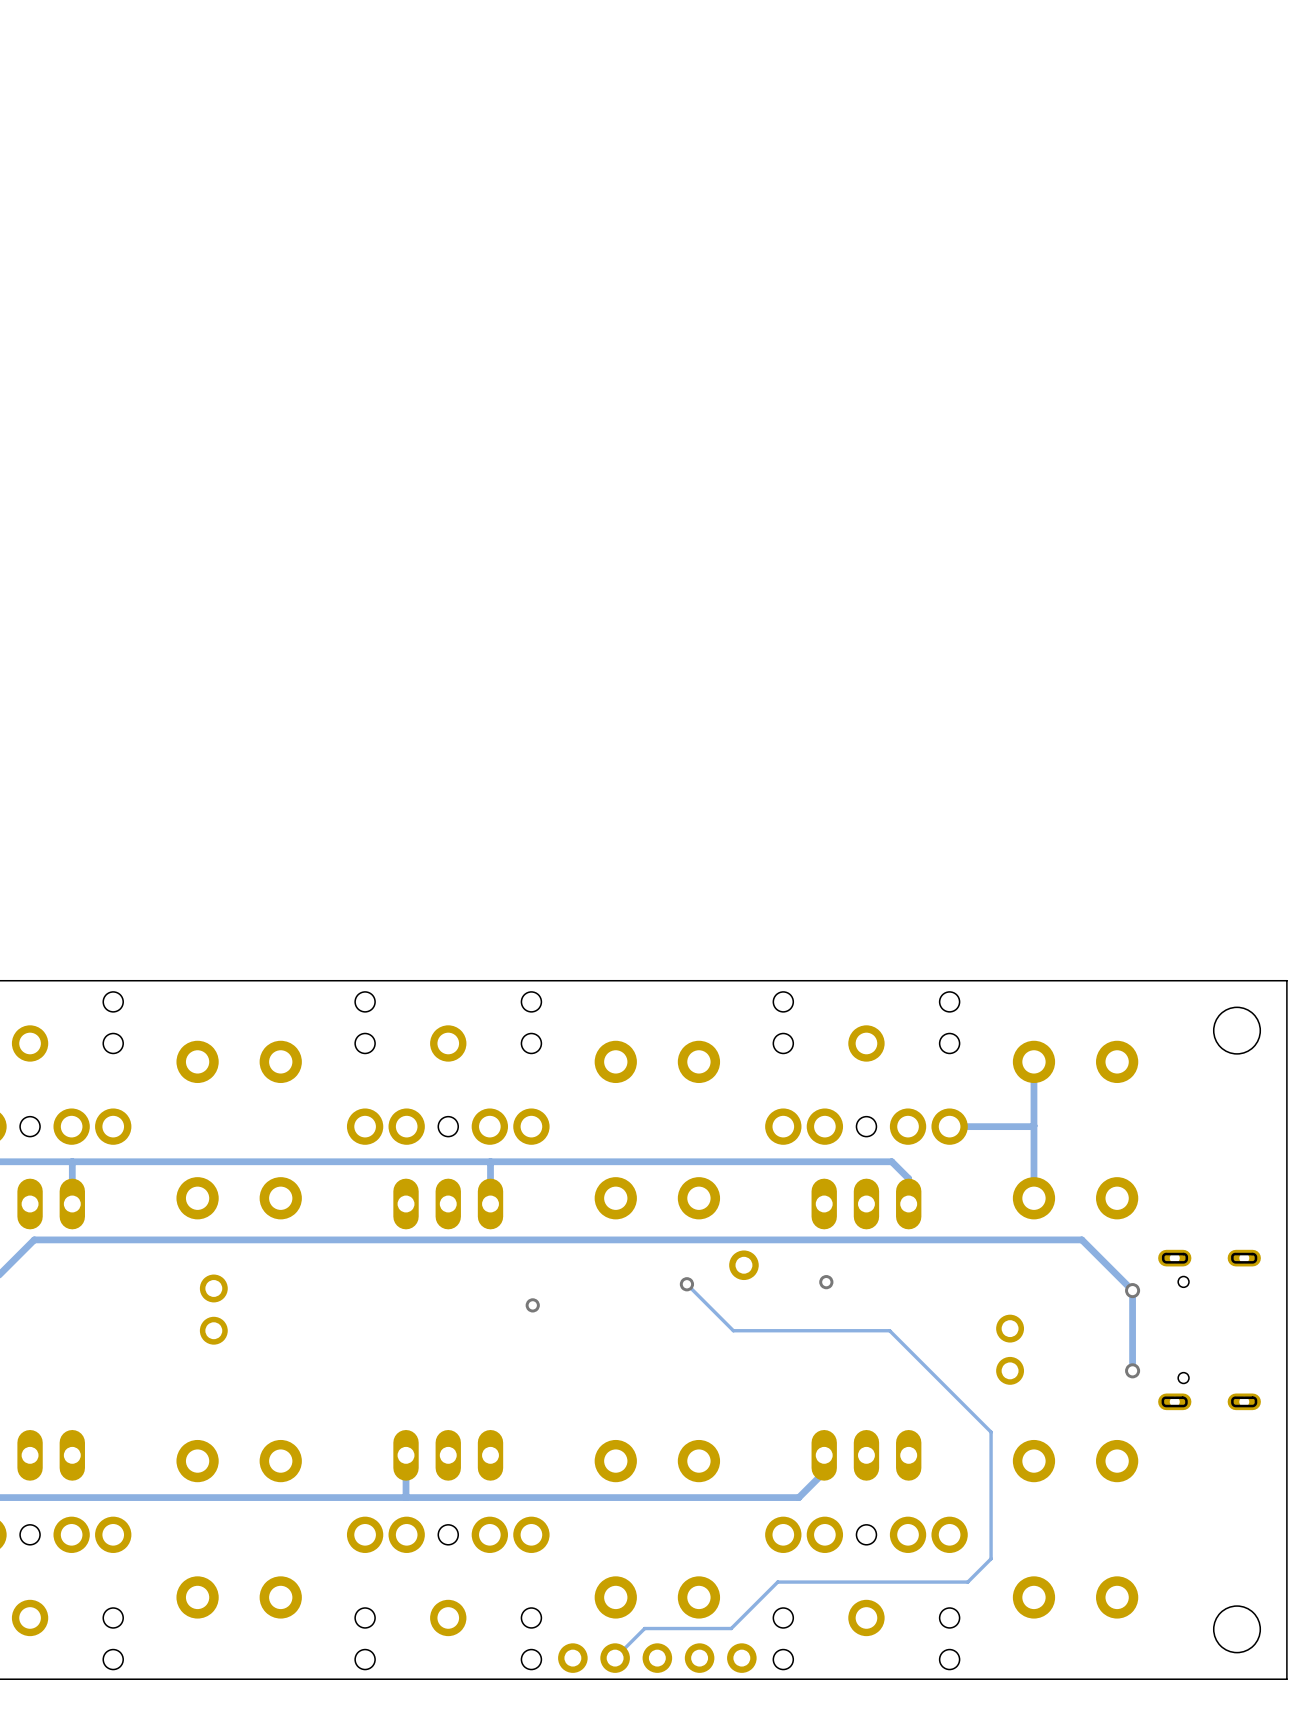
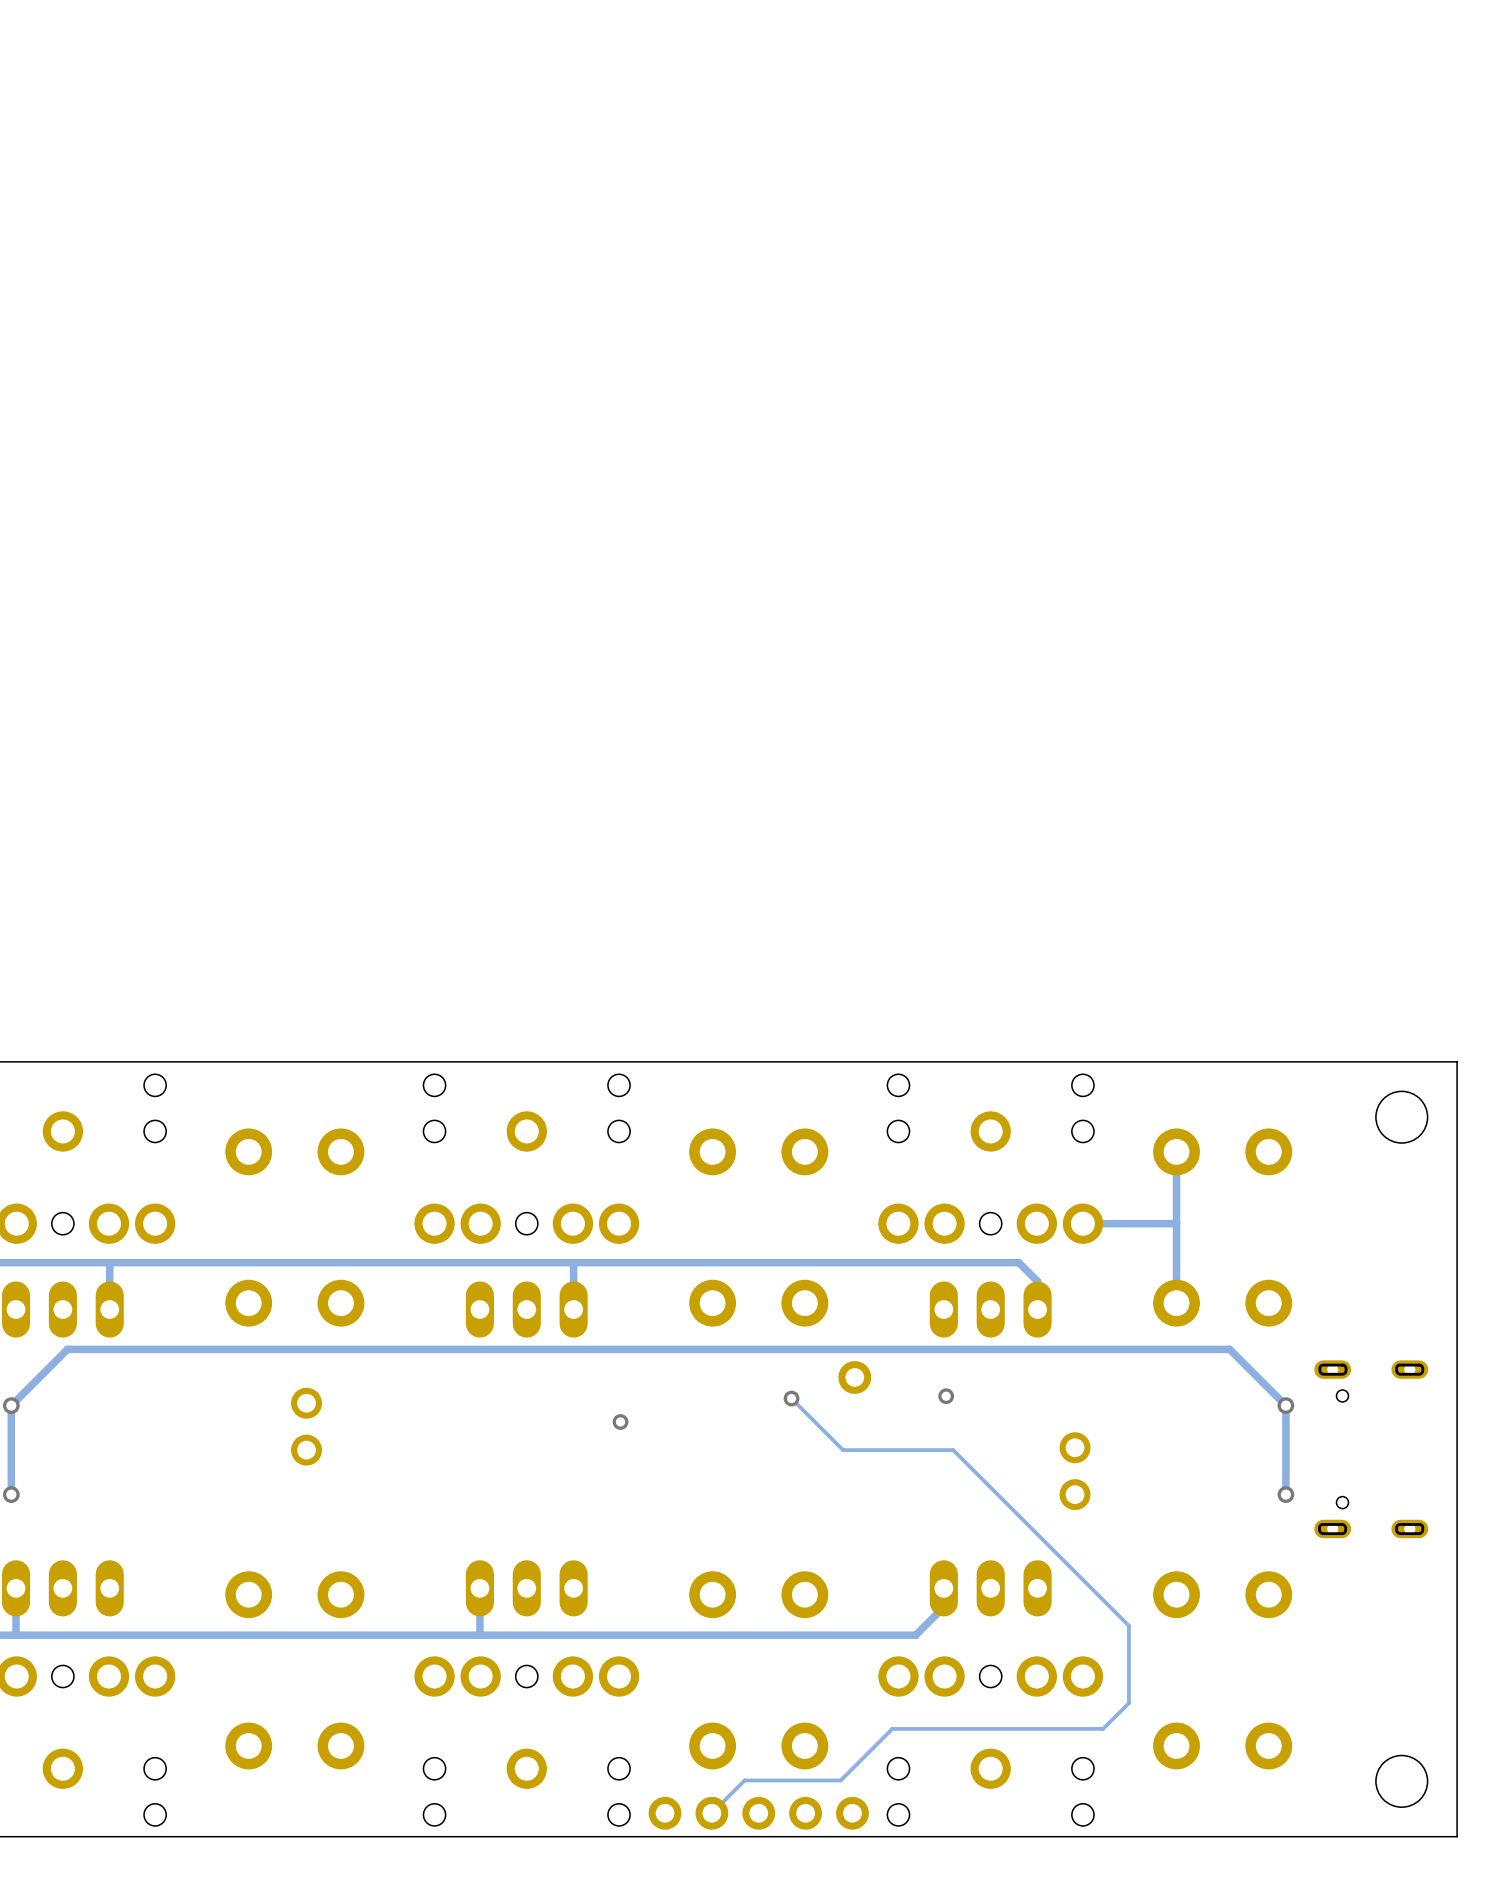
part position: (213, 1309) -> (306, 1426)
track: (832, 1330) (889, 1330) (991, 1432) (991, 1489) -> (953, 1450) (1128, 1625)
part position: (1010, 1349) -> (1075, 1471)

